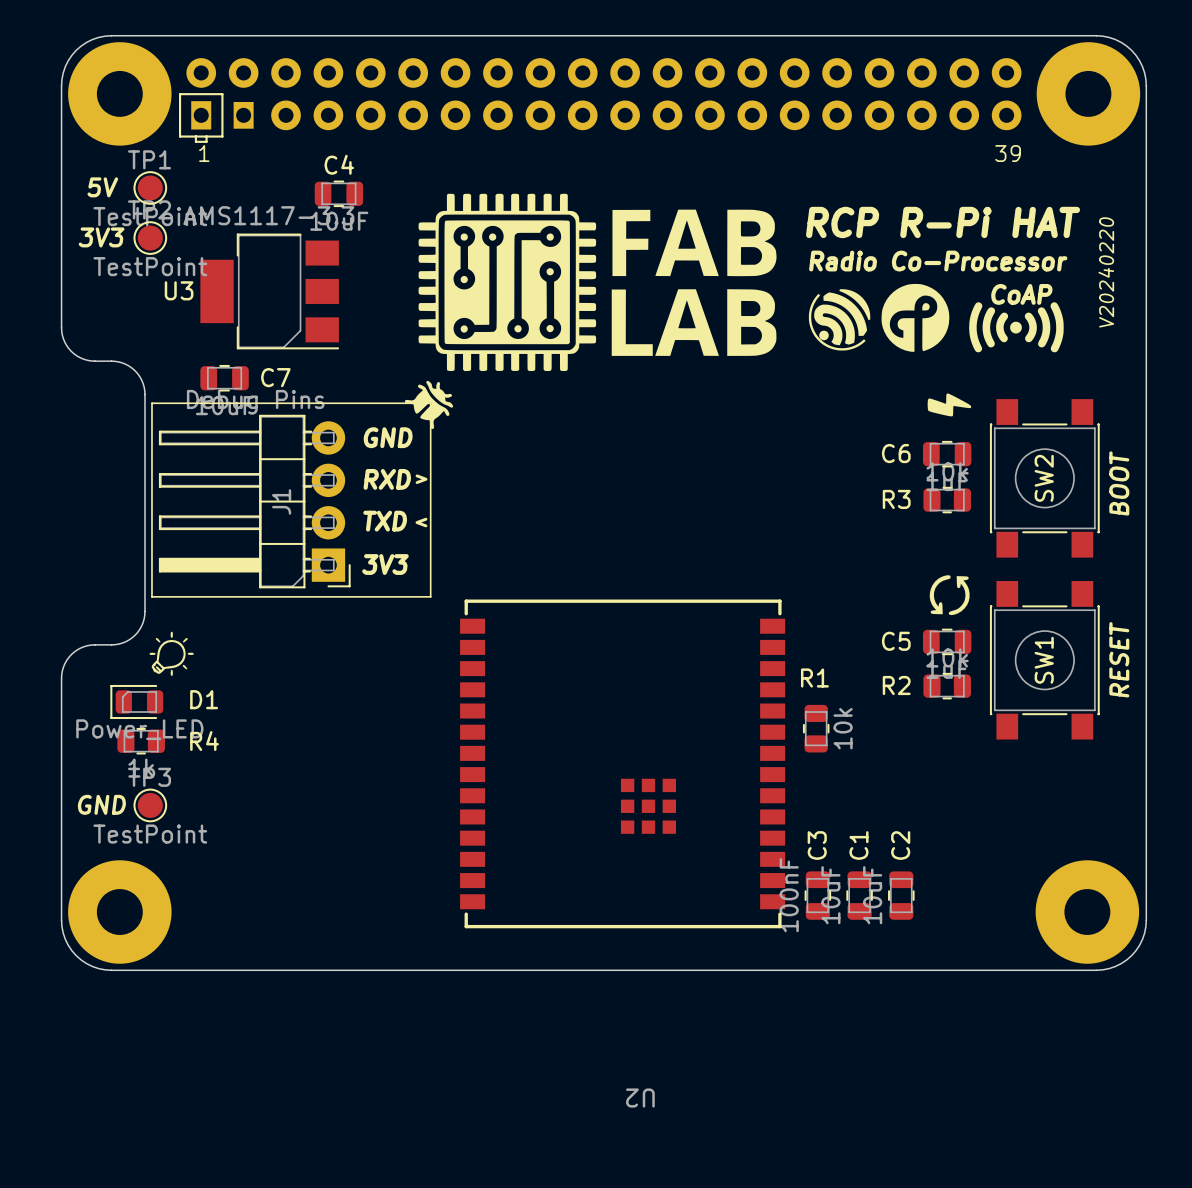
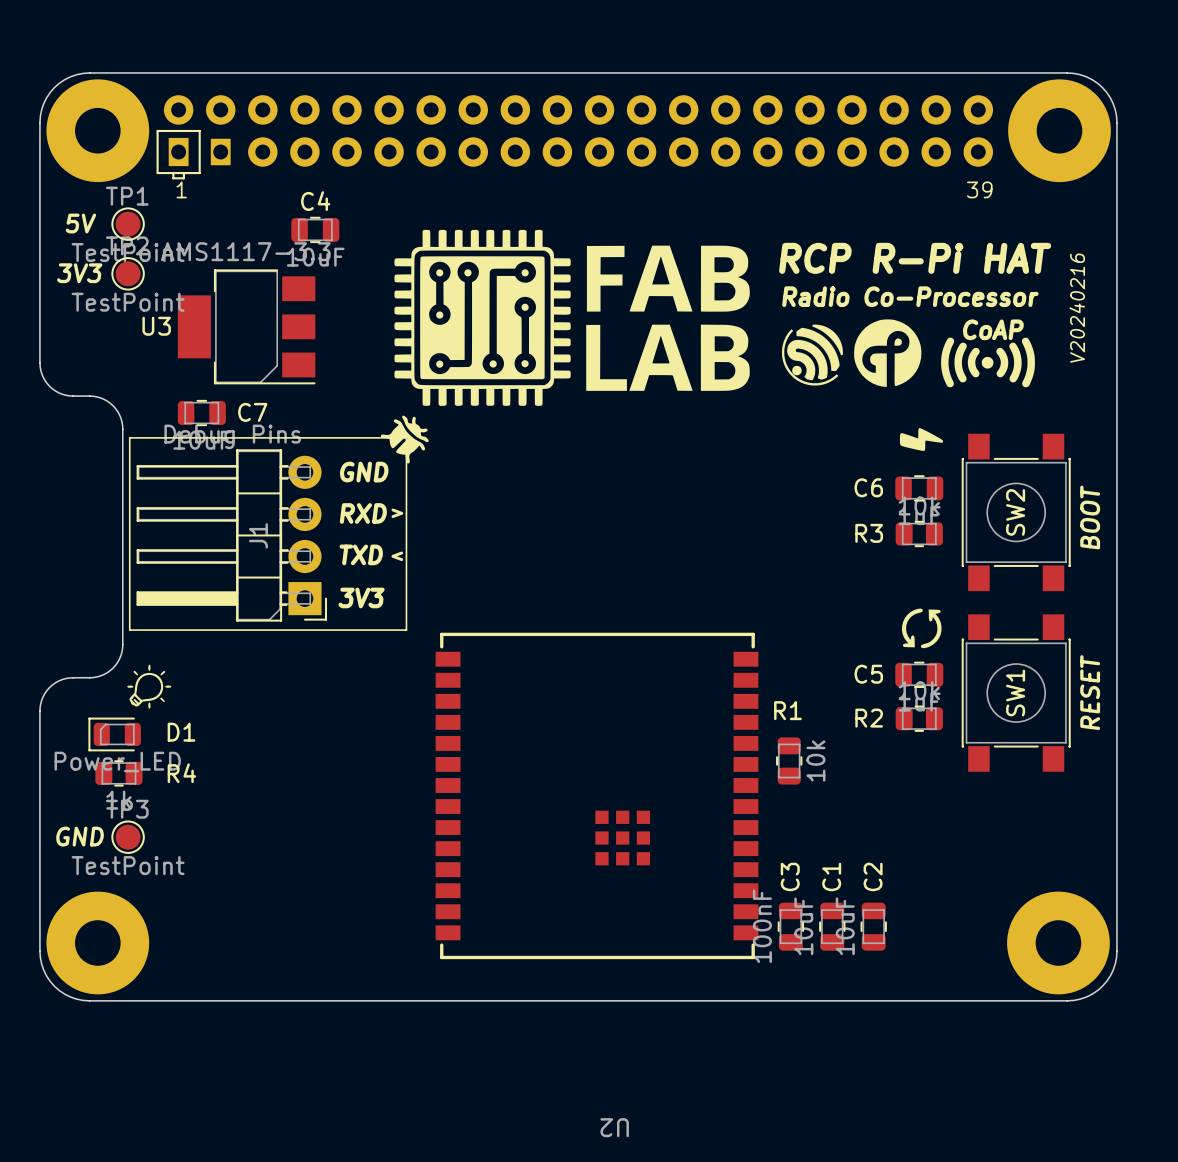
text: V20240220 (1106, 272) -> V20240216 (1077, 308)

